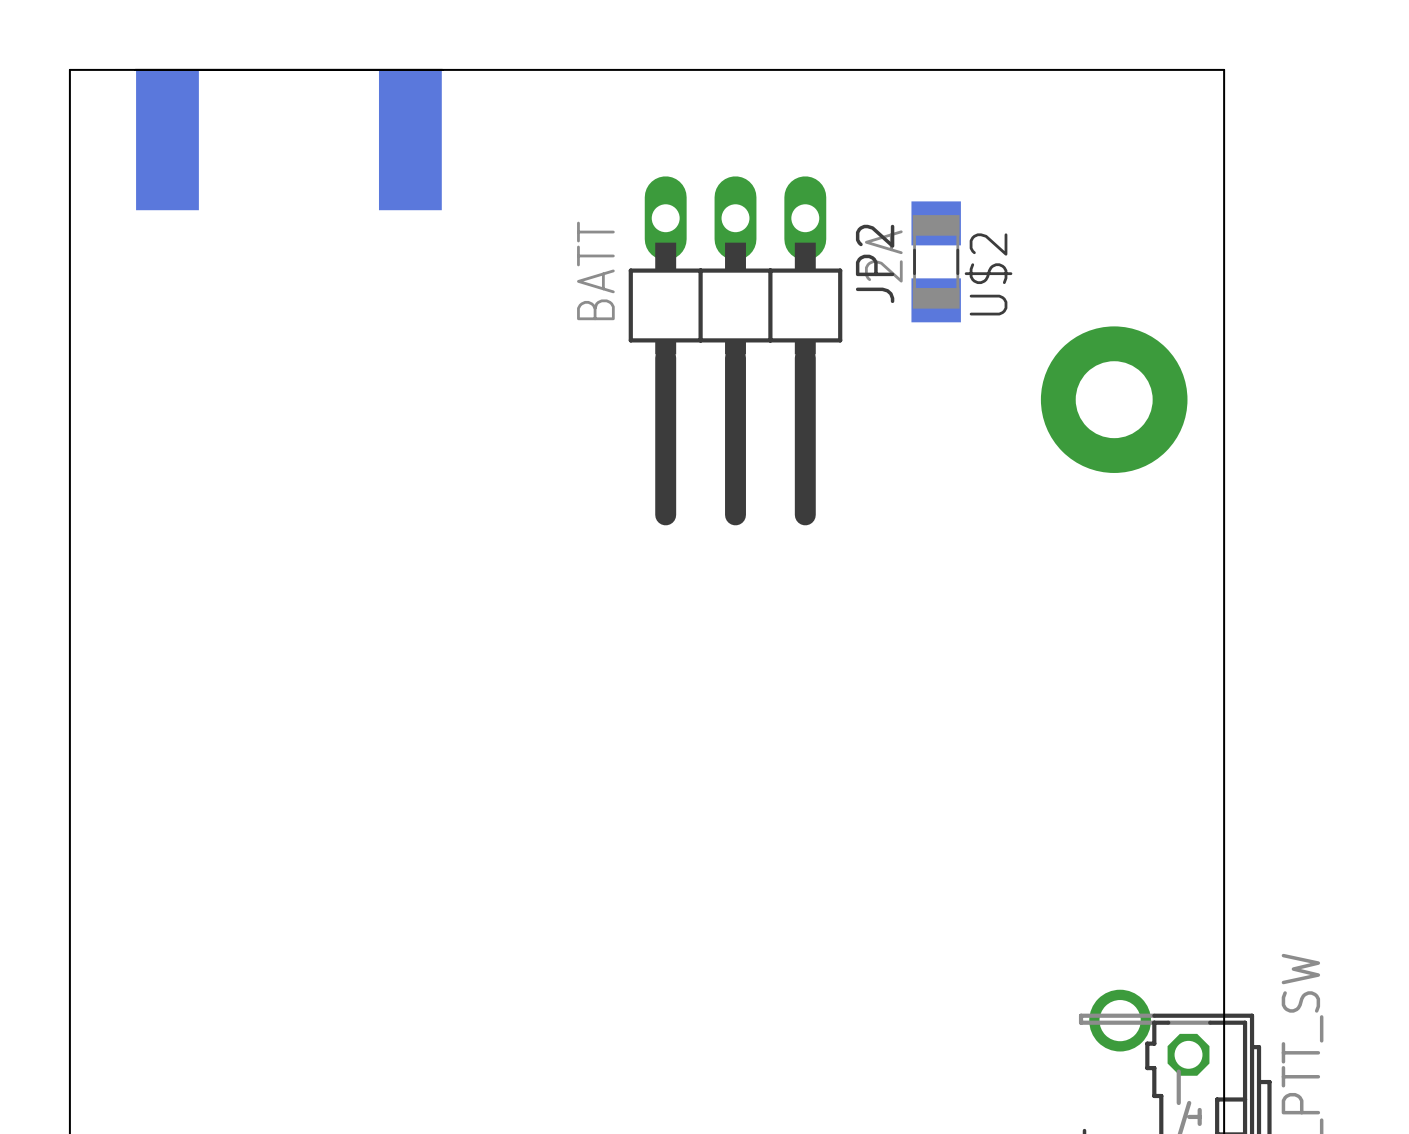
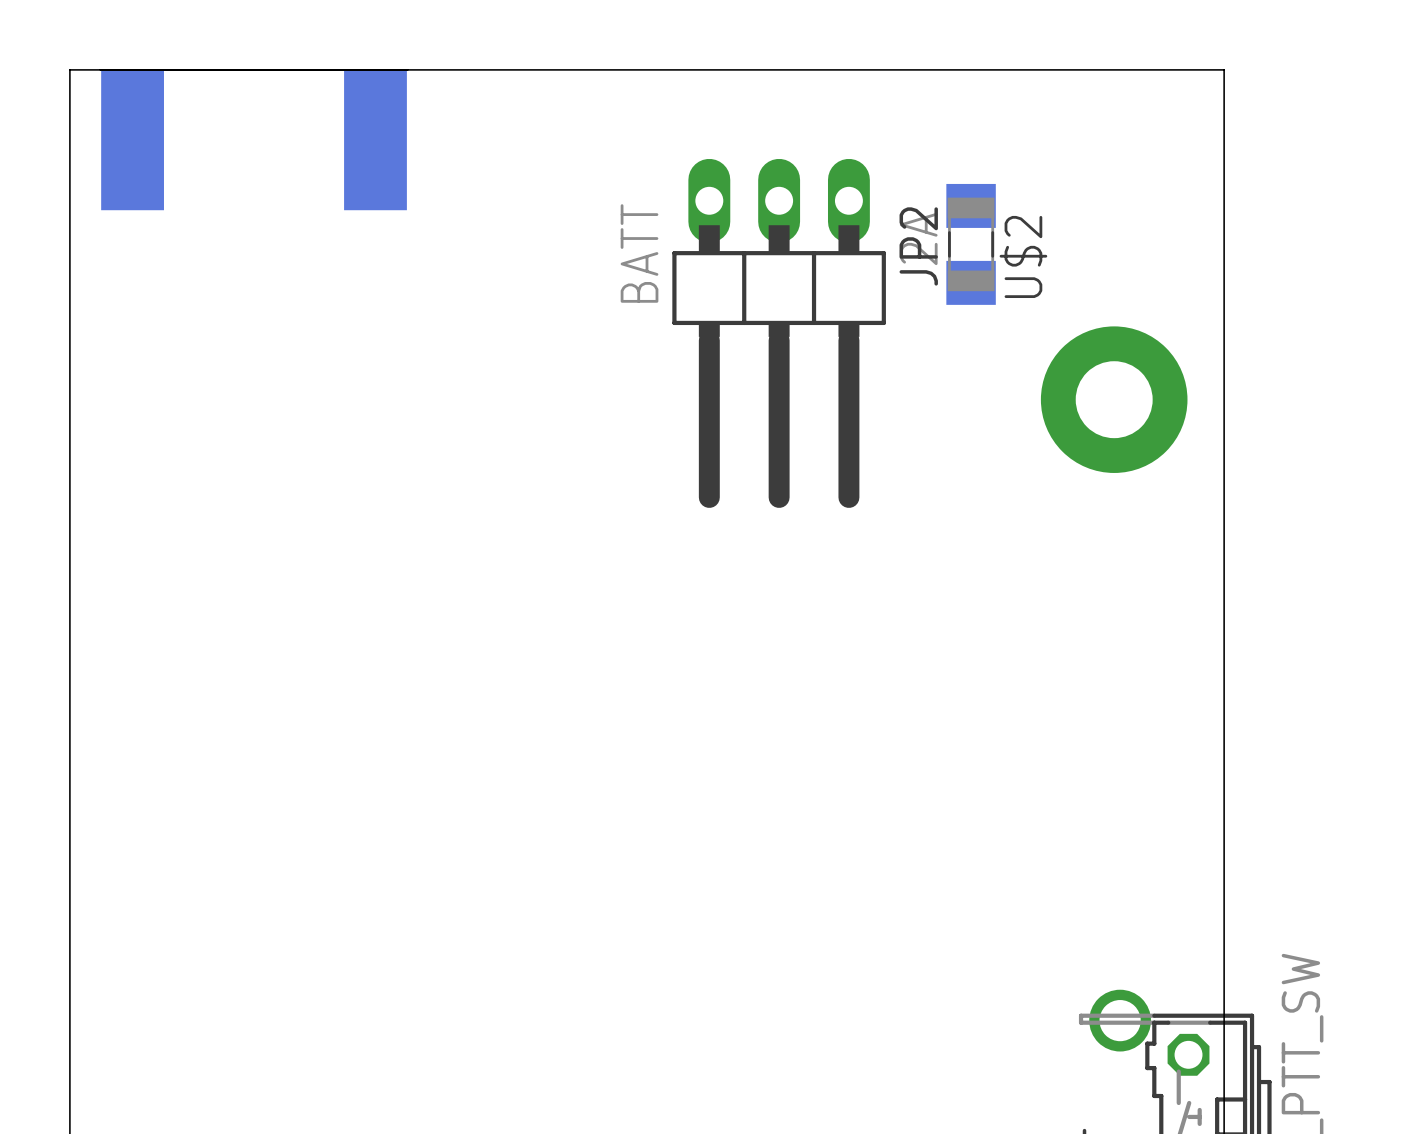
part position: (288, 140) -> (254, 140)
U$2 position: (936, 261) -> (971, 244)
JP2 position: (735, 350) -> (779, 333)

